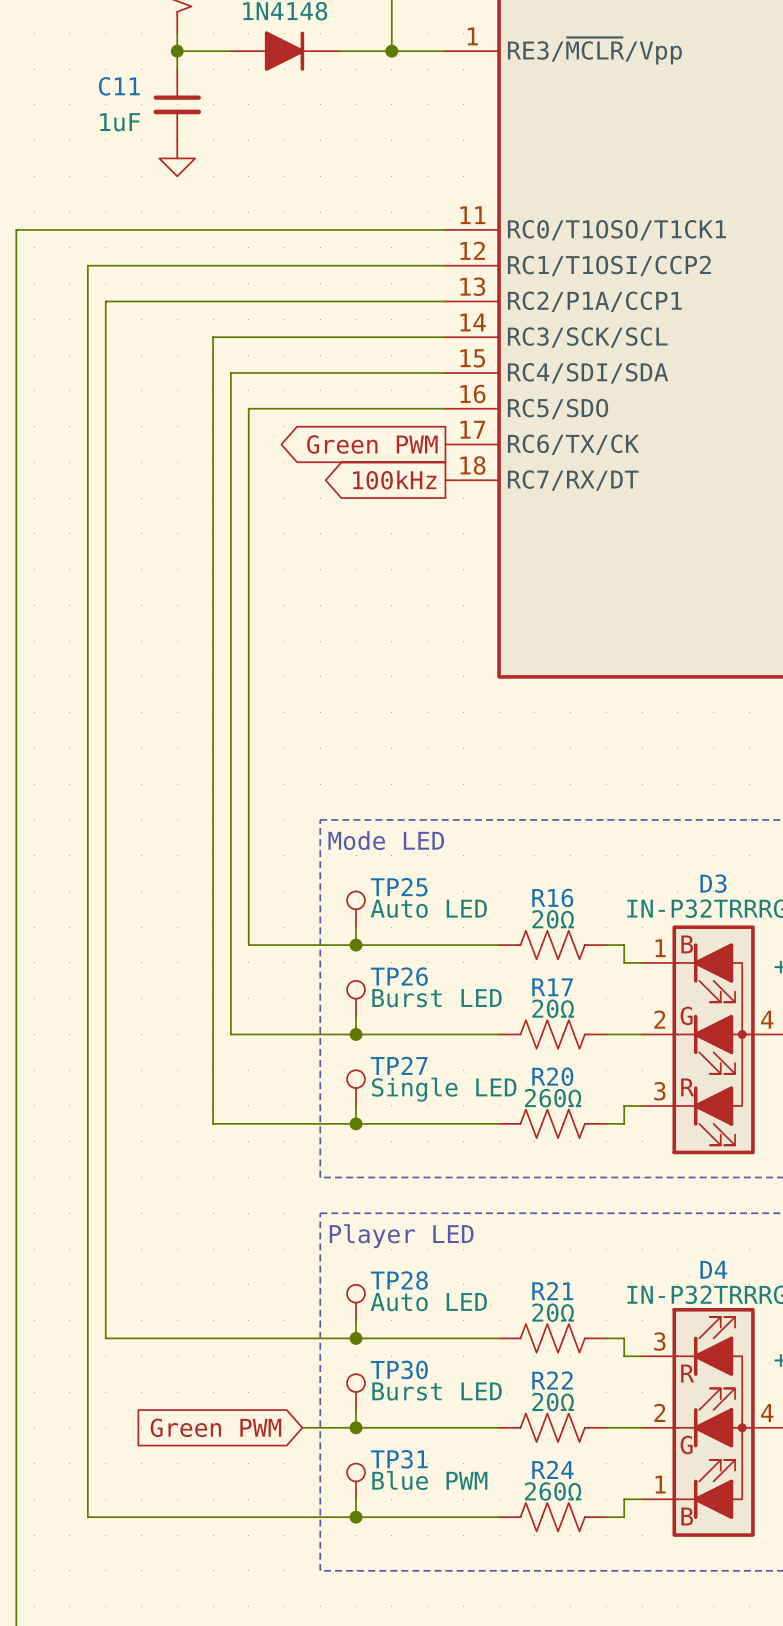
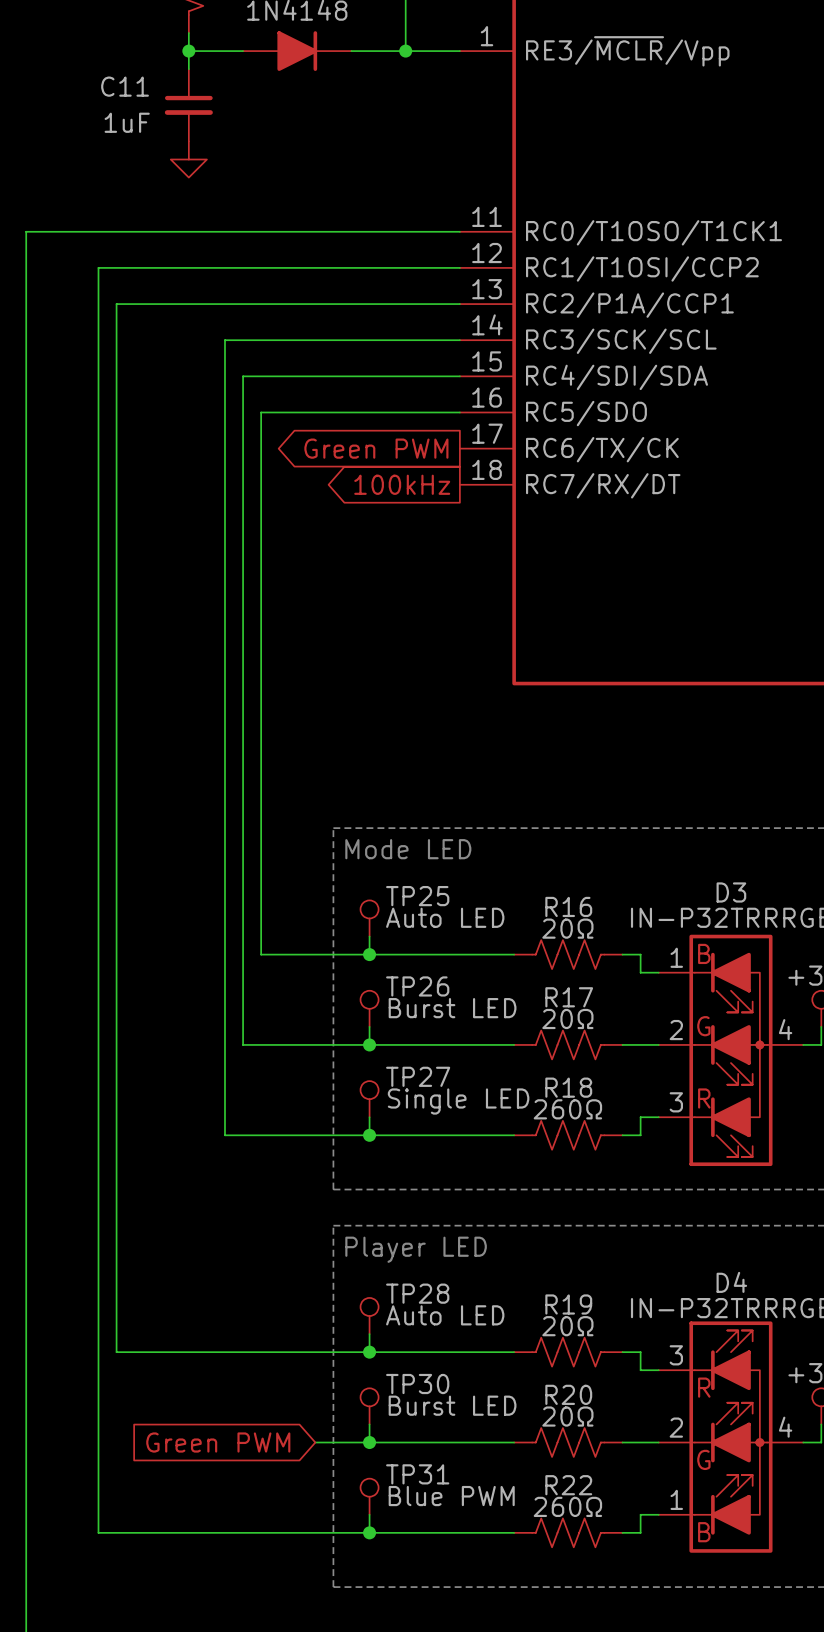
R20 name: R20 (552, 1076) -> R18 (568, 1087)
R21 name: R21 (552, 1291) -> R19 (568, 1304)
R22 name: R22 (552, 1380) -> R20 (568, 1394)
R24 name: R24 (552, 1469) -> R22 (568, 1485)

